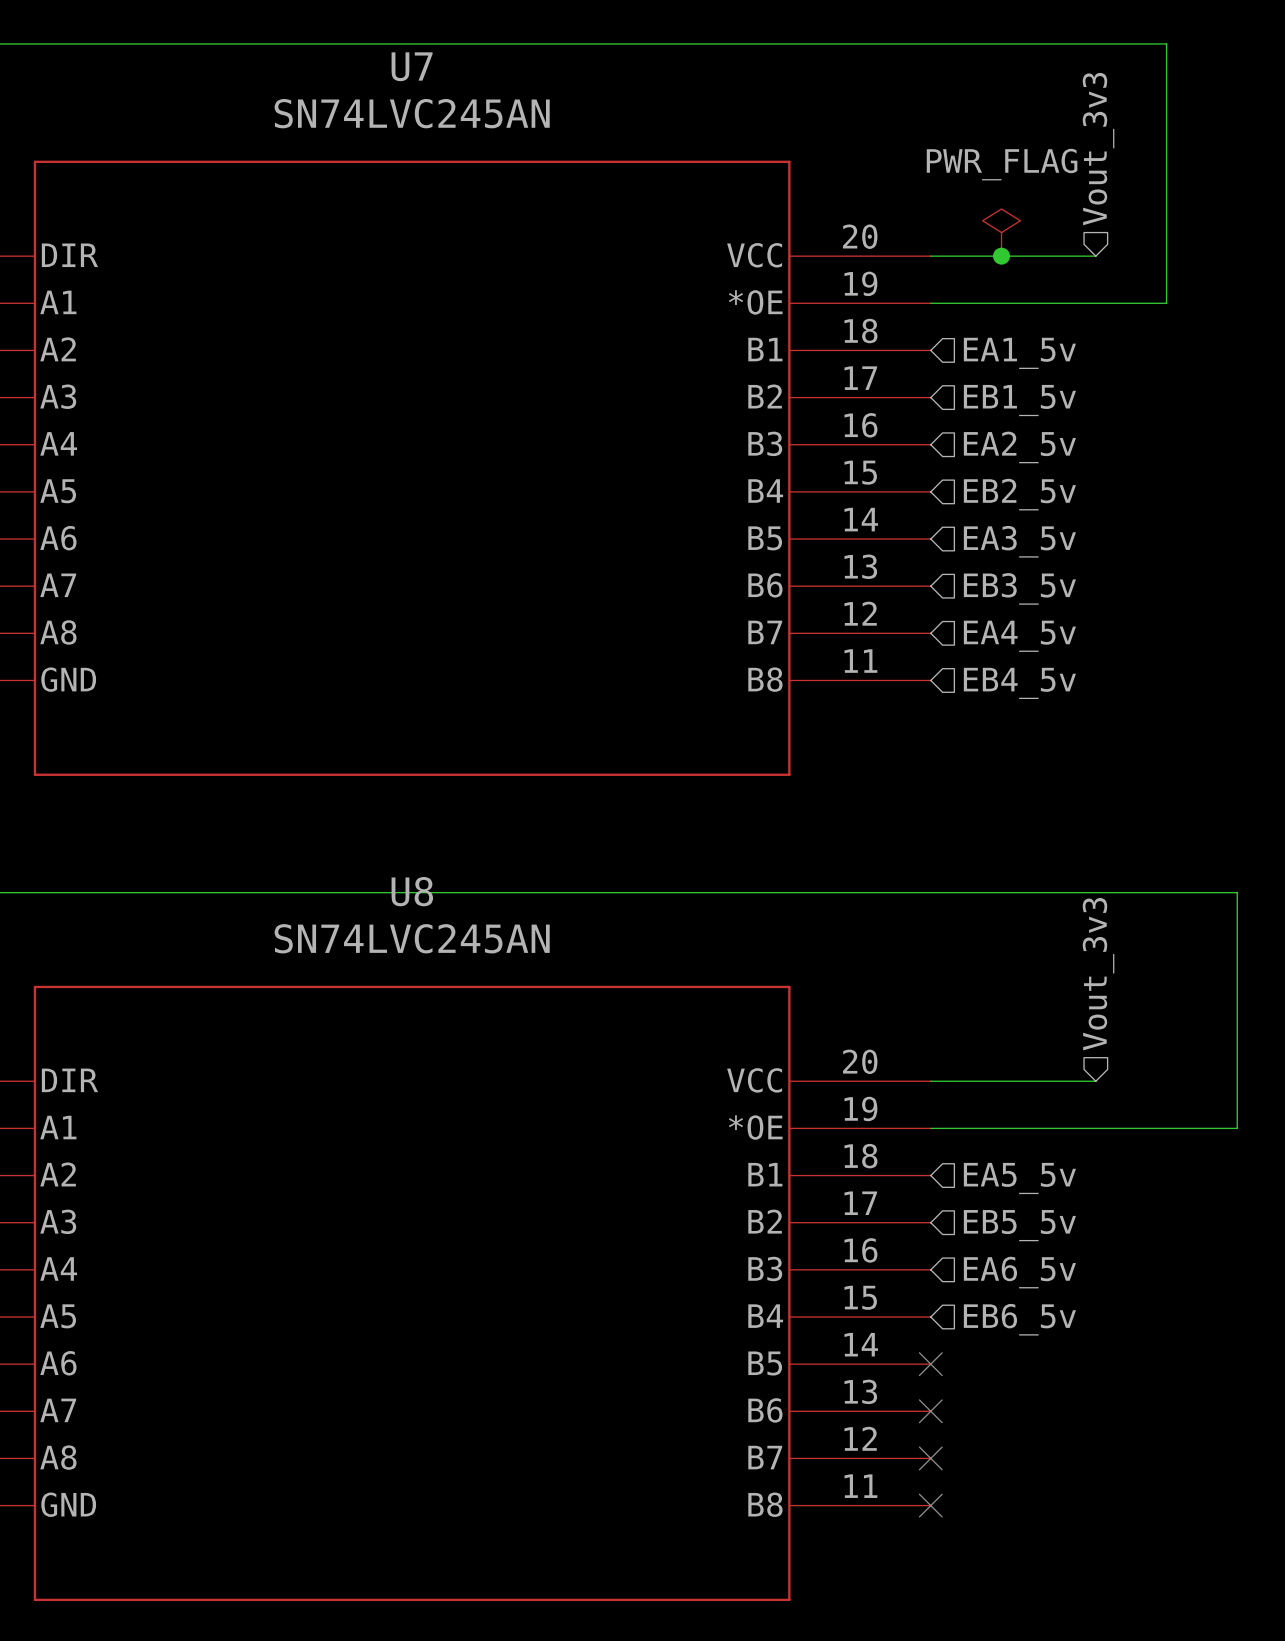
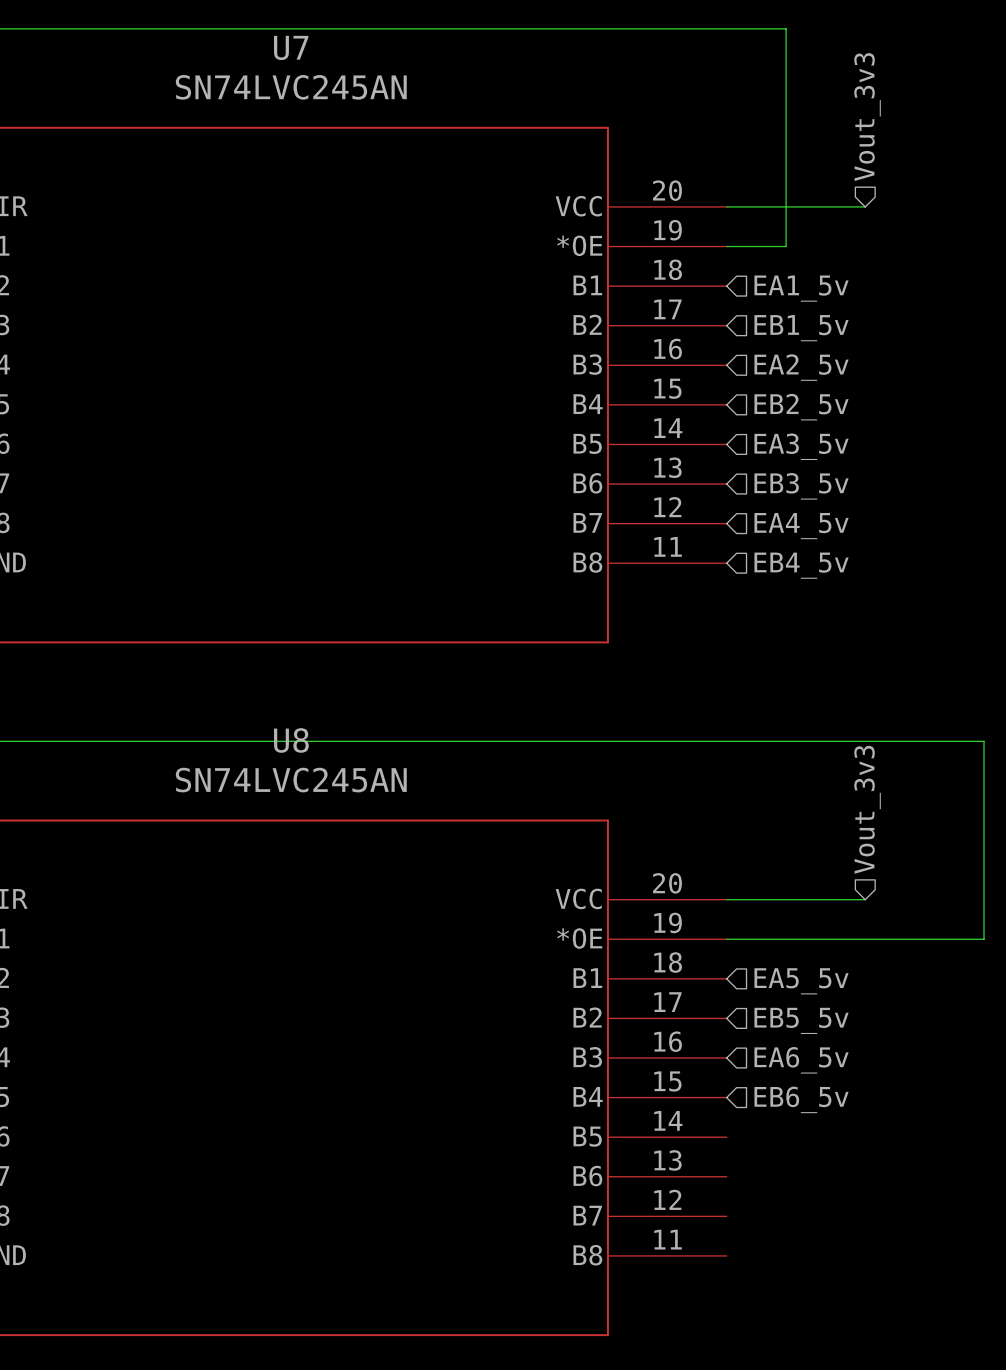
wire: (1001, 43) (1166, 43) (1166, 303) (1001, 303) -> (786, 28) (786, 246)
power symbol: PWR_FLAG (1001, 232) -> none
junction: (1001, 256) -> none
no-connect mark: (930, 1364) -> none
no-connect mark: (930, 1411) -> none
no-connect mark: (930, 1458) -> none
no-connect mark: (930, 1505) -> none

